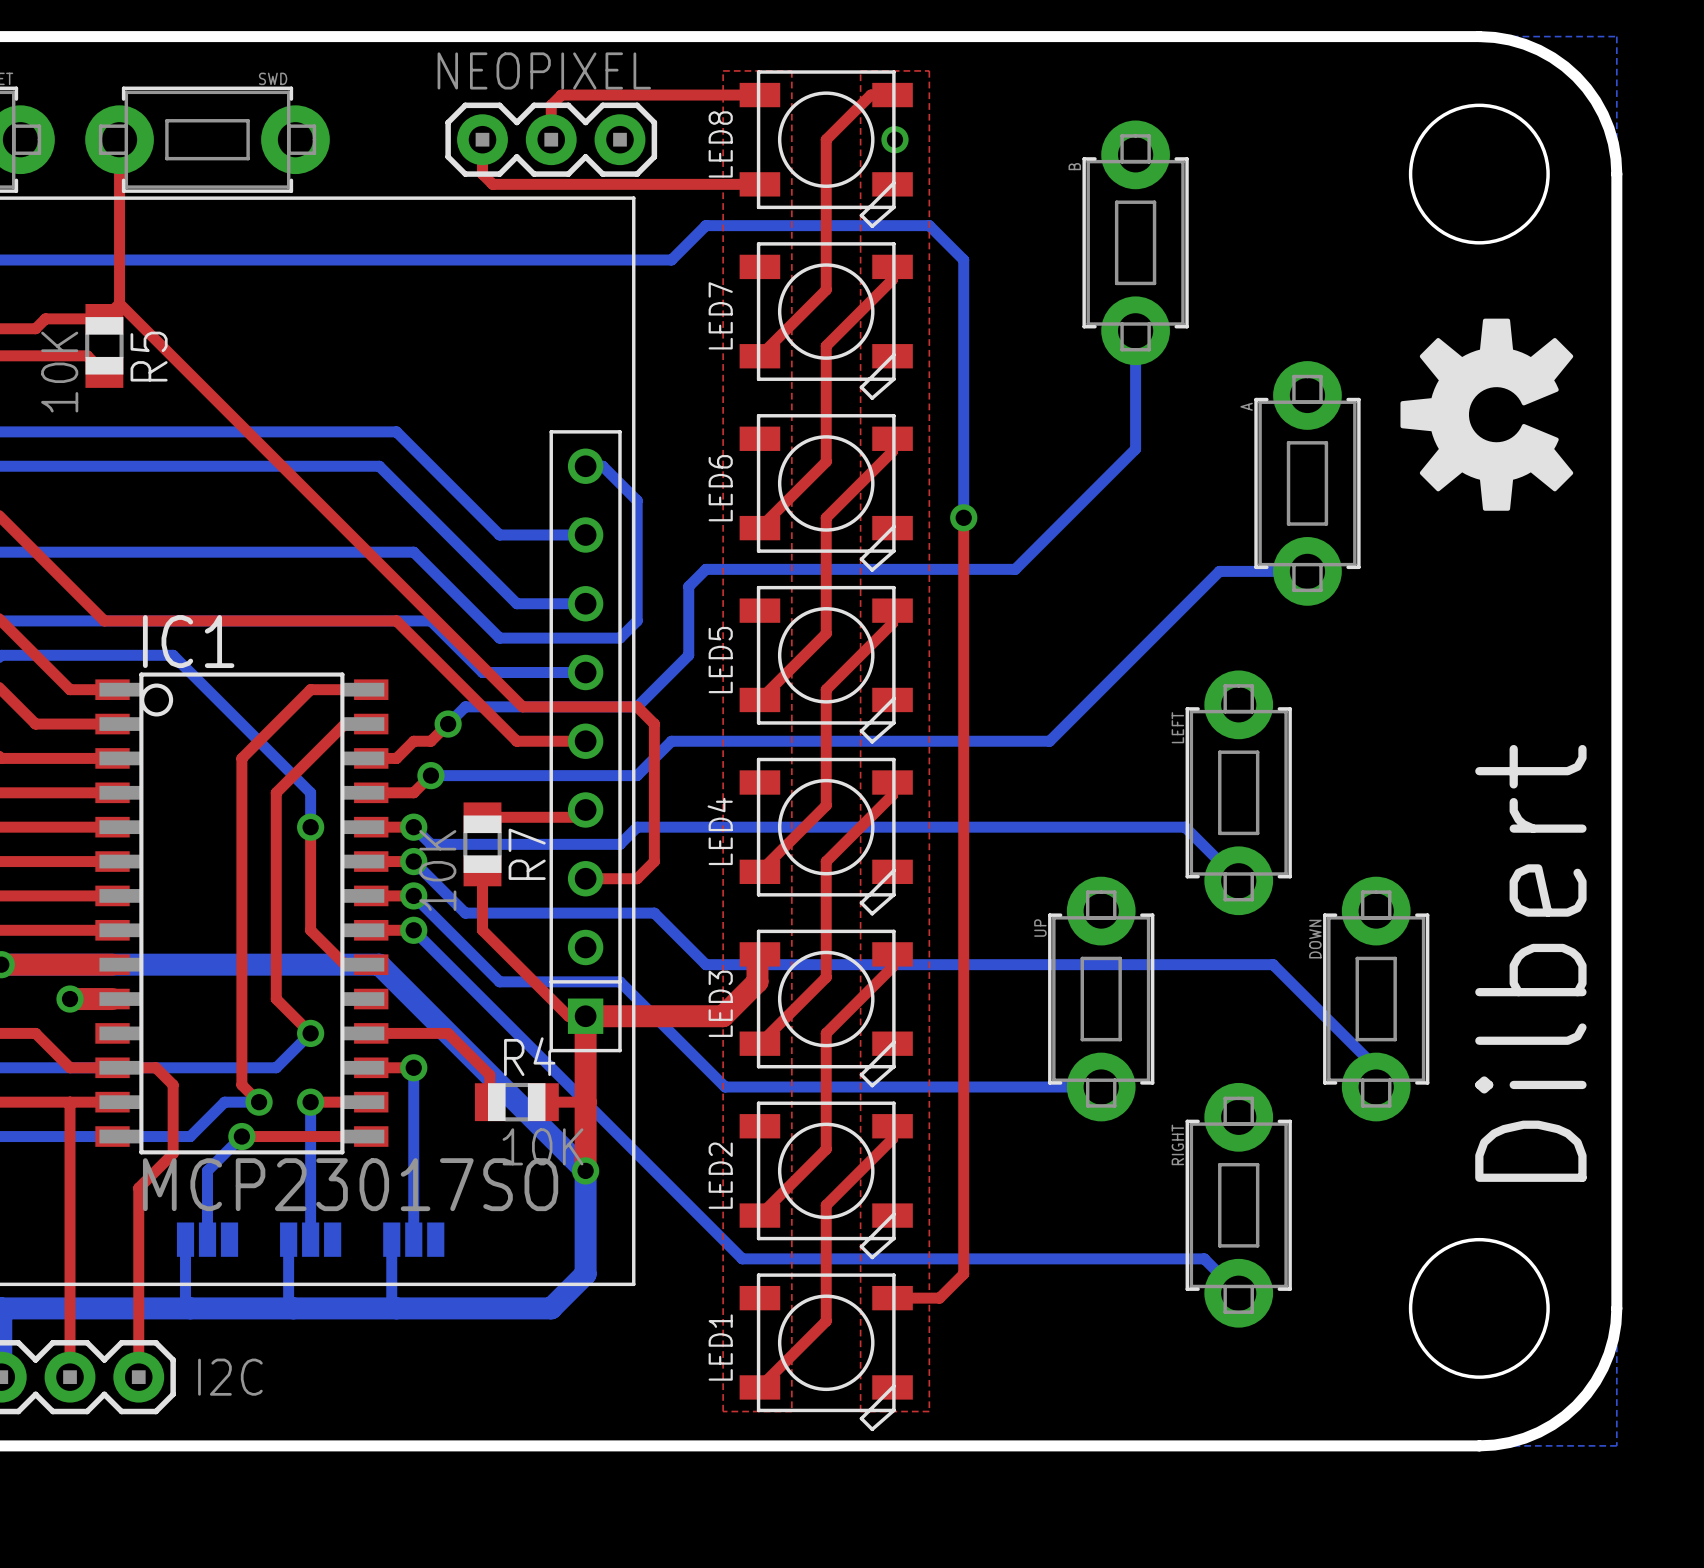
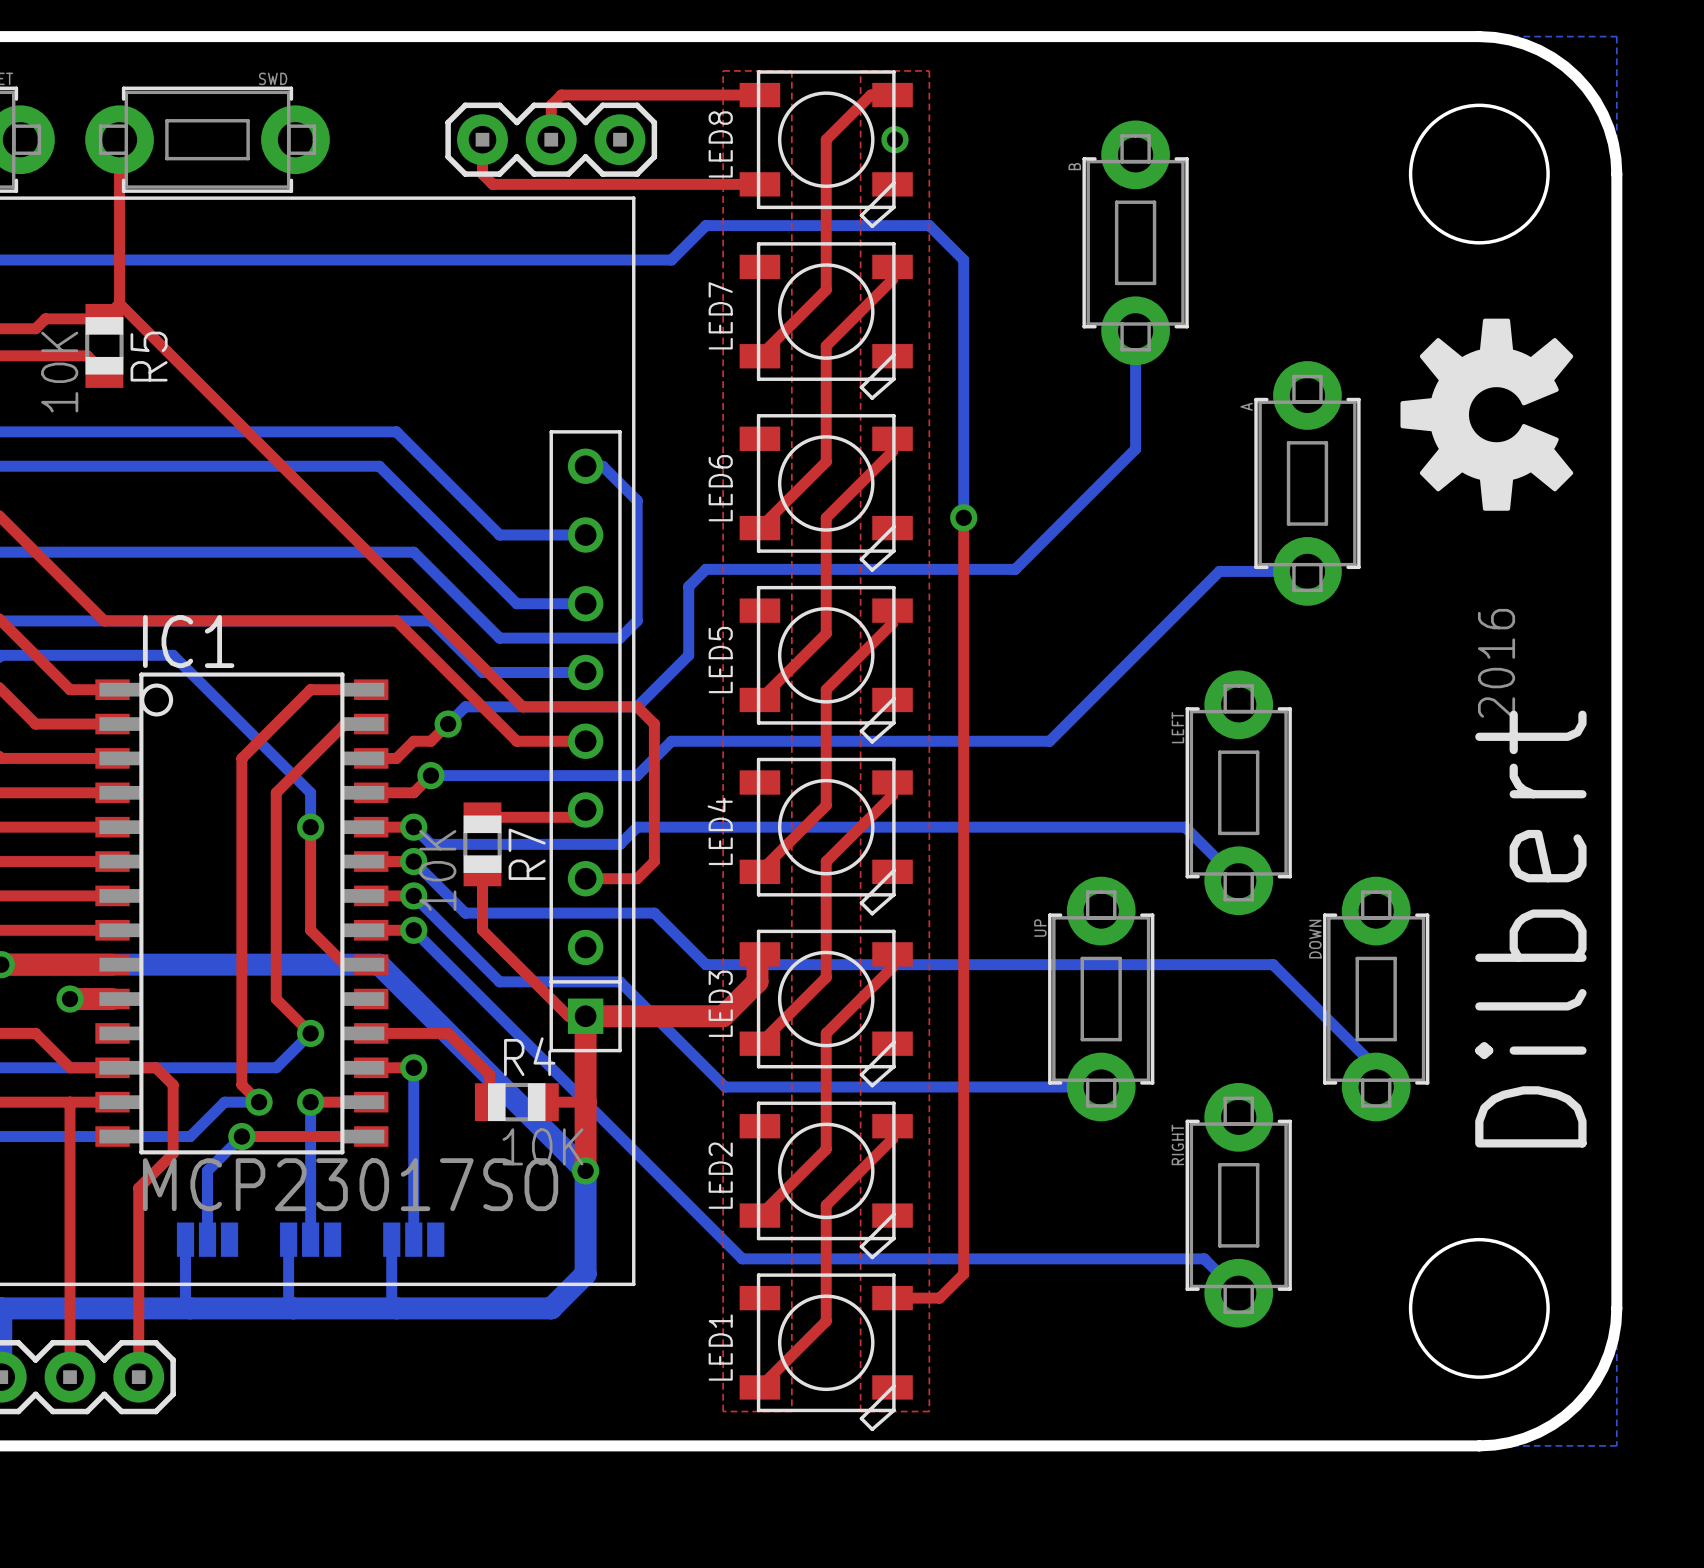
part value: NEOPIXEL (544, 70) -> none
text: none -> 2016 (1496, 664)
text position: Dilbert (1530, 963) -> Dilbert (1530, 929)
part value: I2C (230, 1377) -> none

